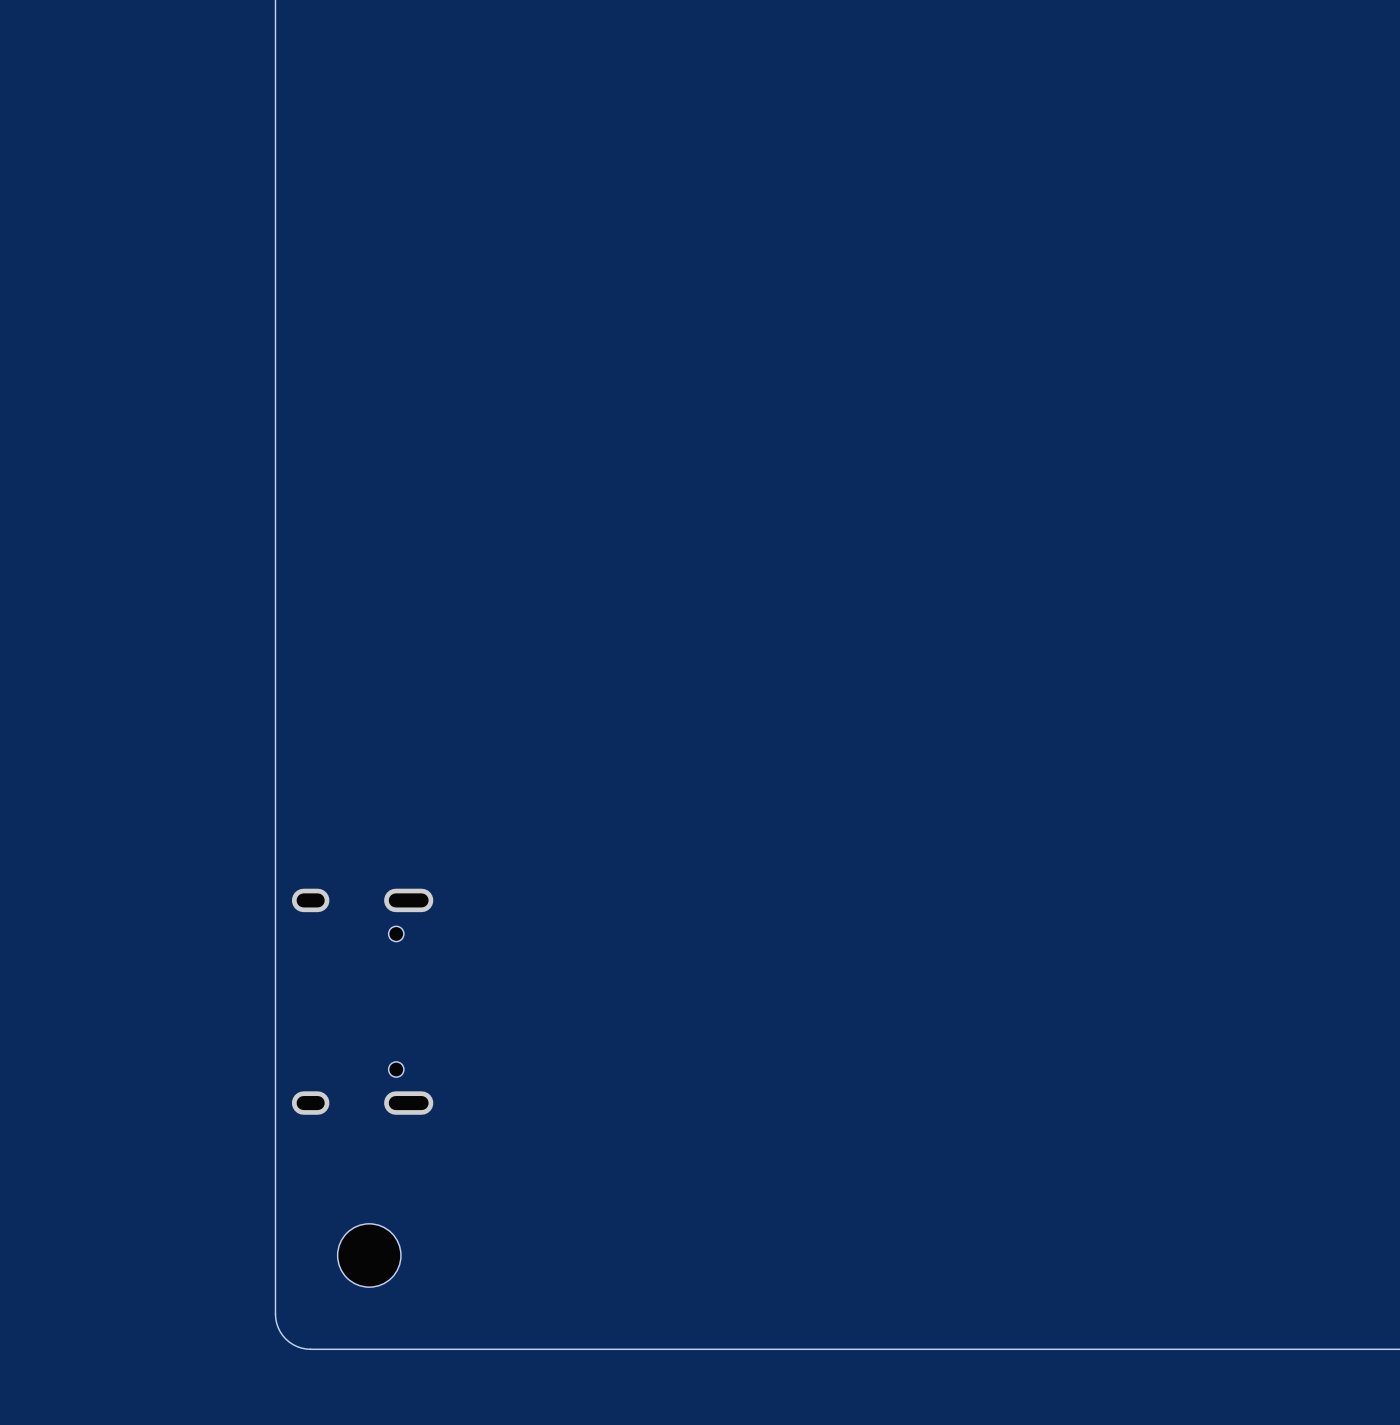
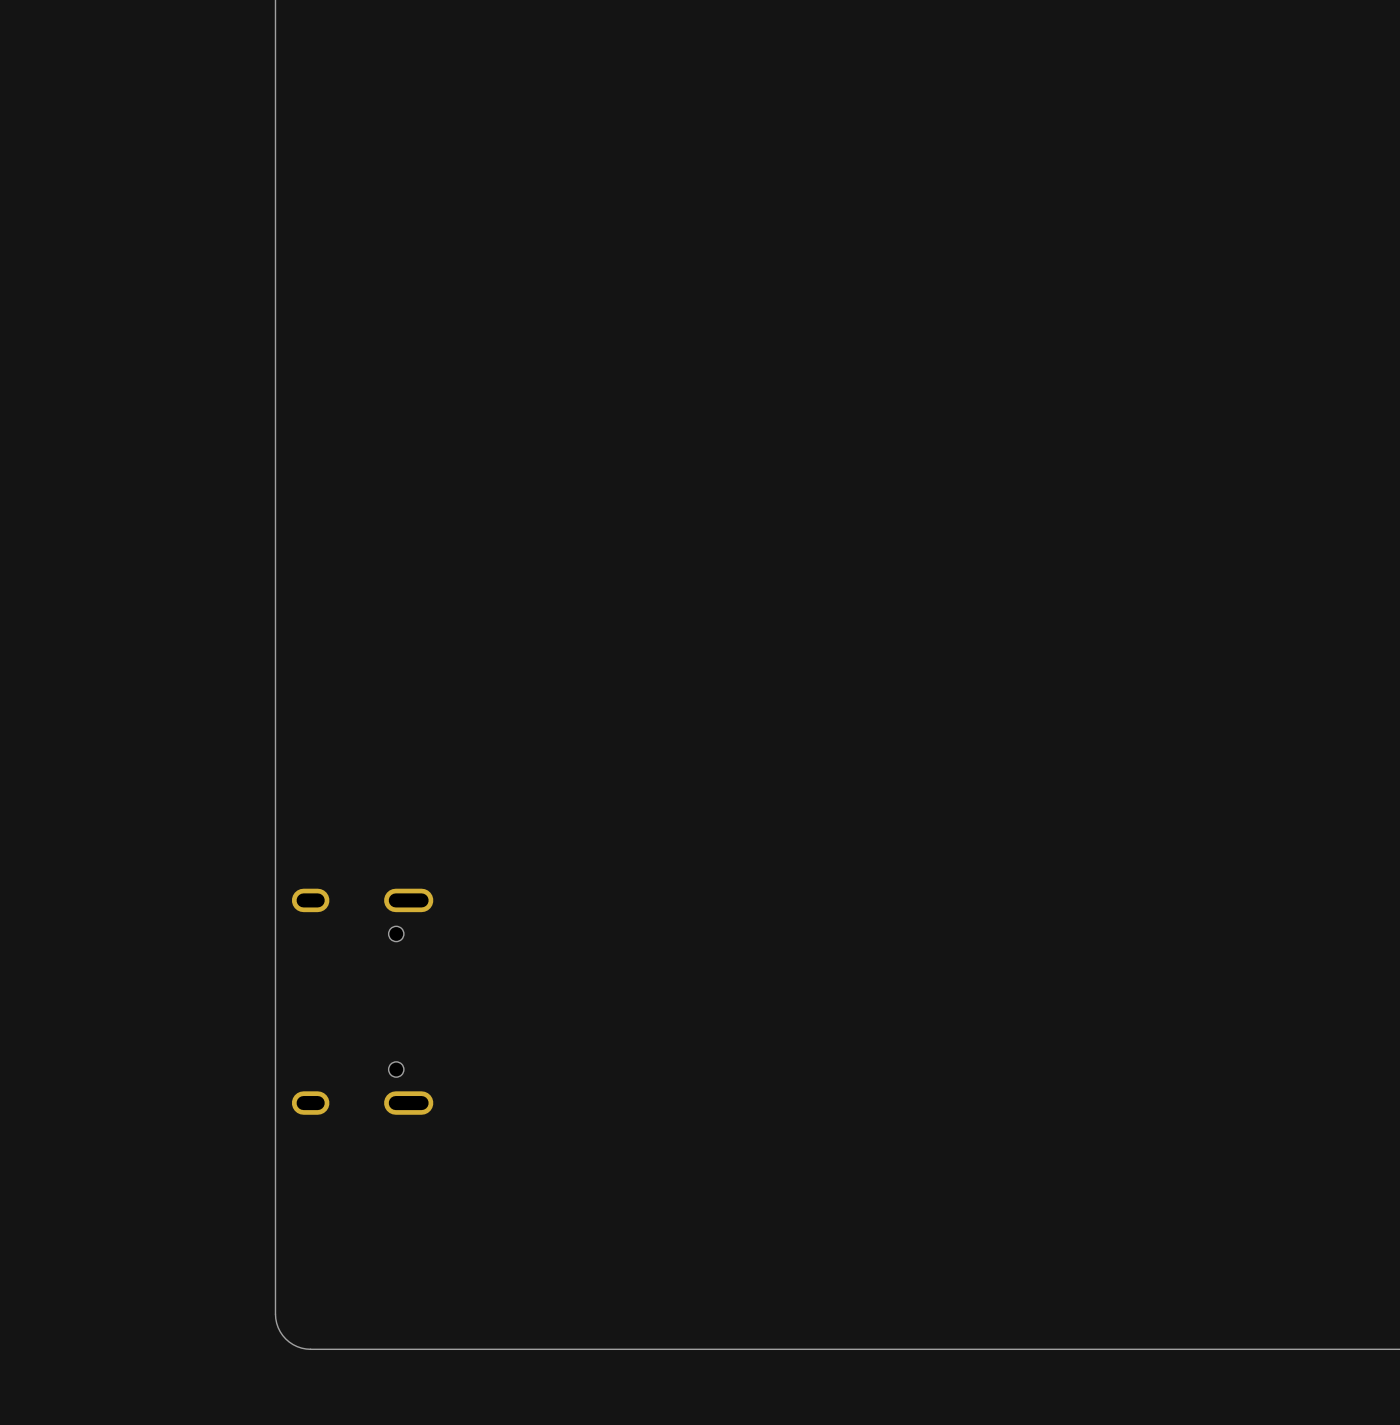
part: (369, 1255) -> none

